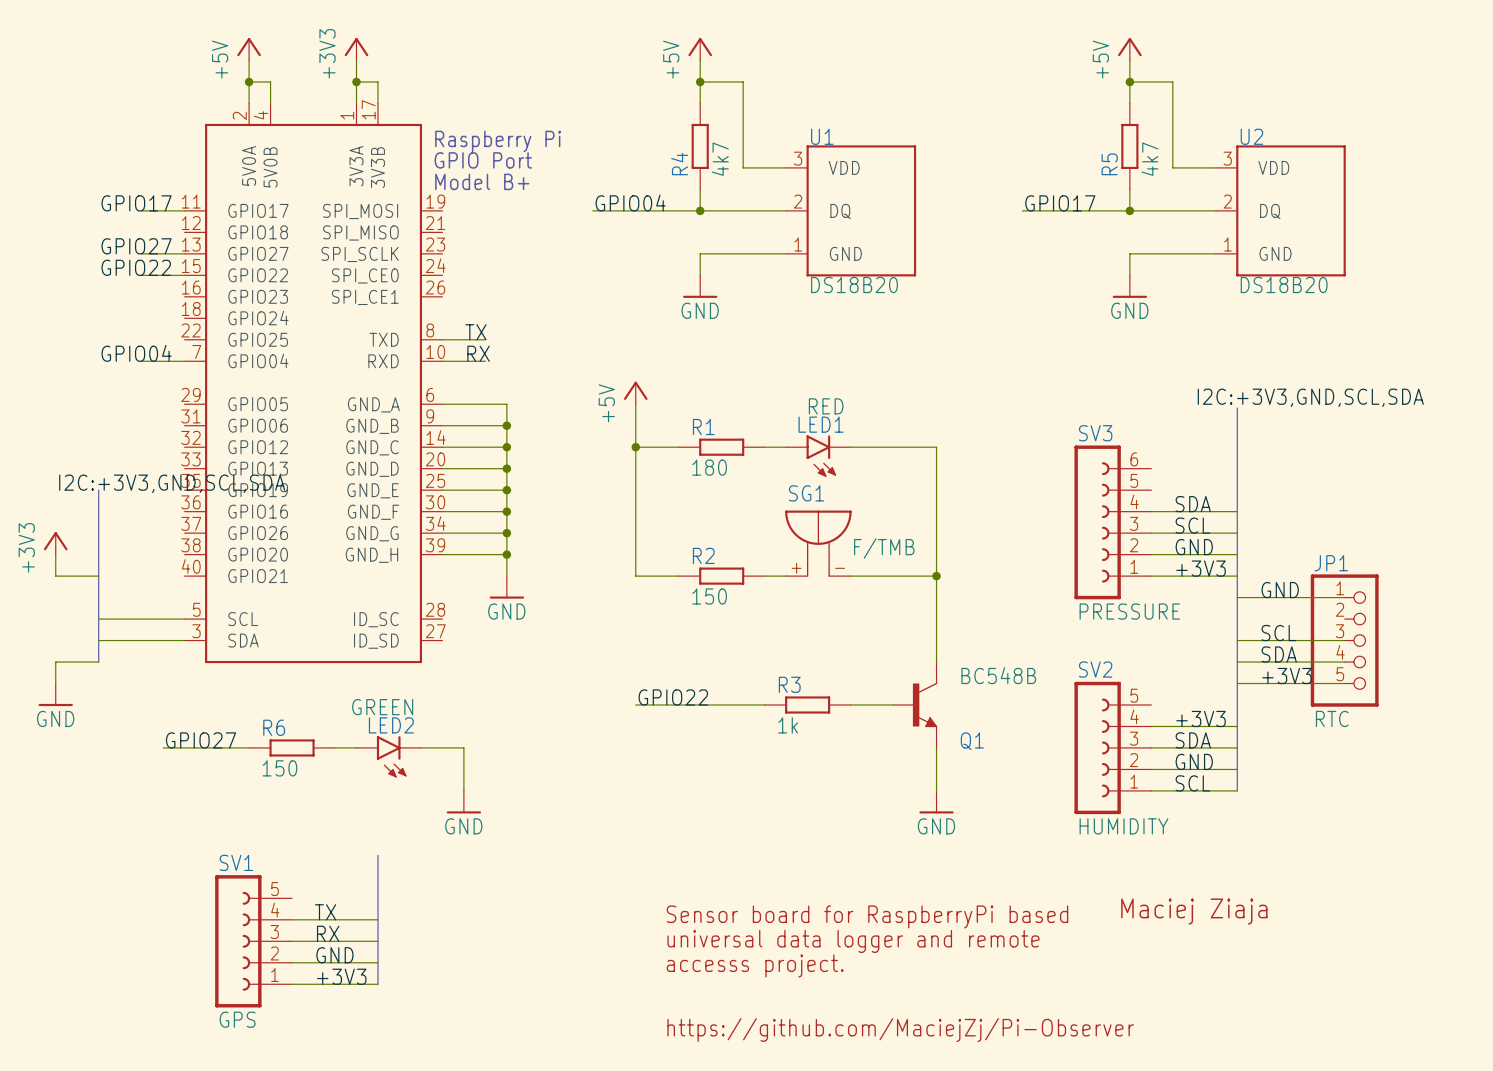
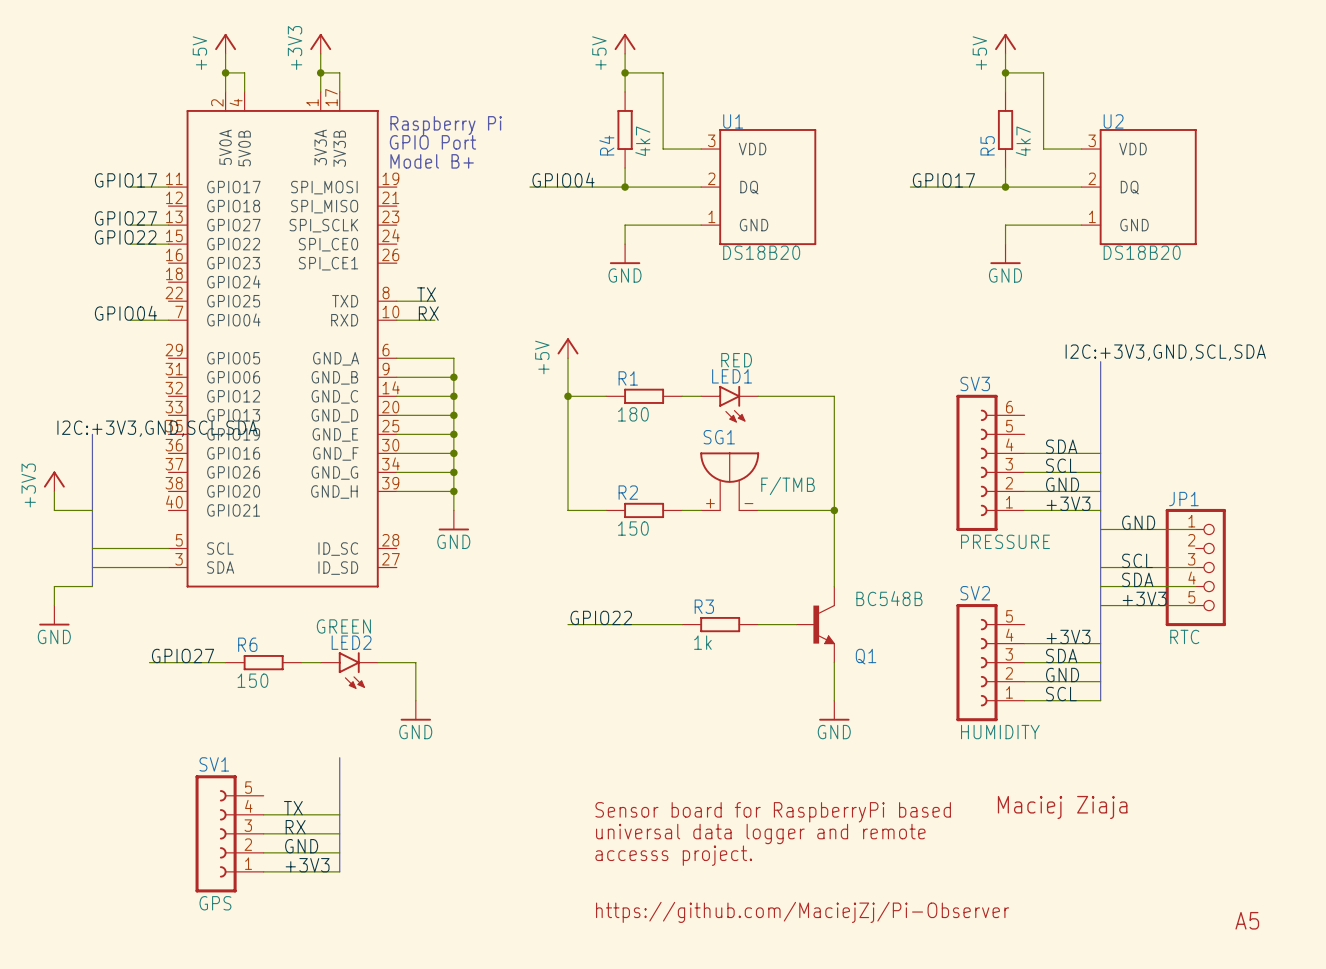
text: none -> A5 (1247, 920)

